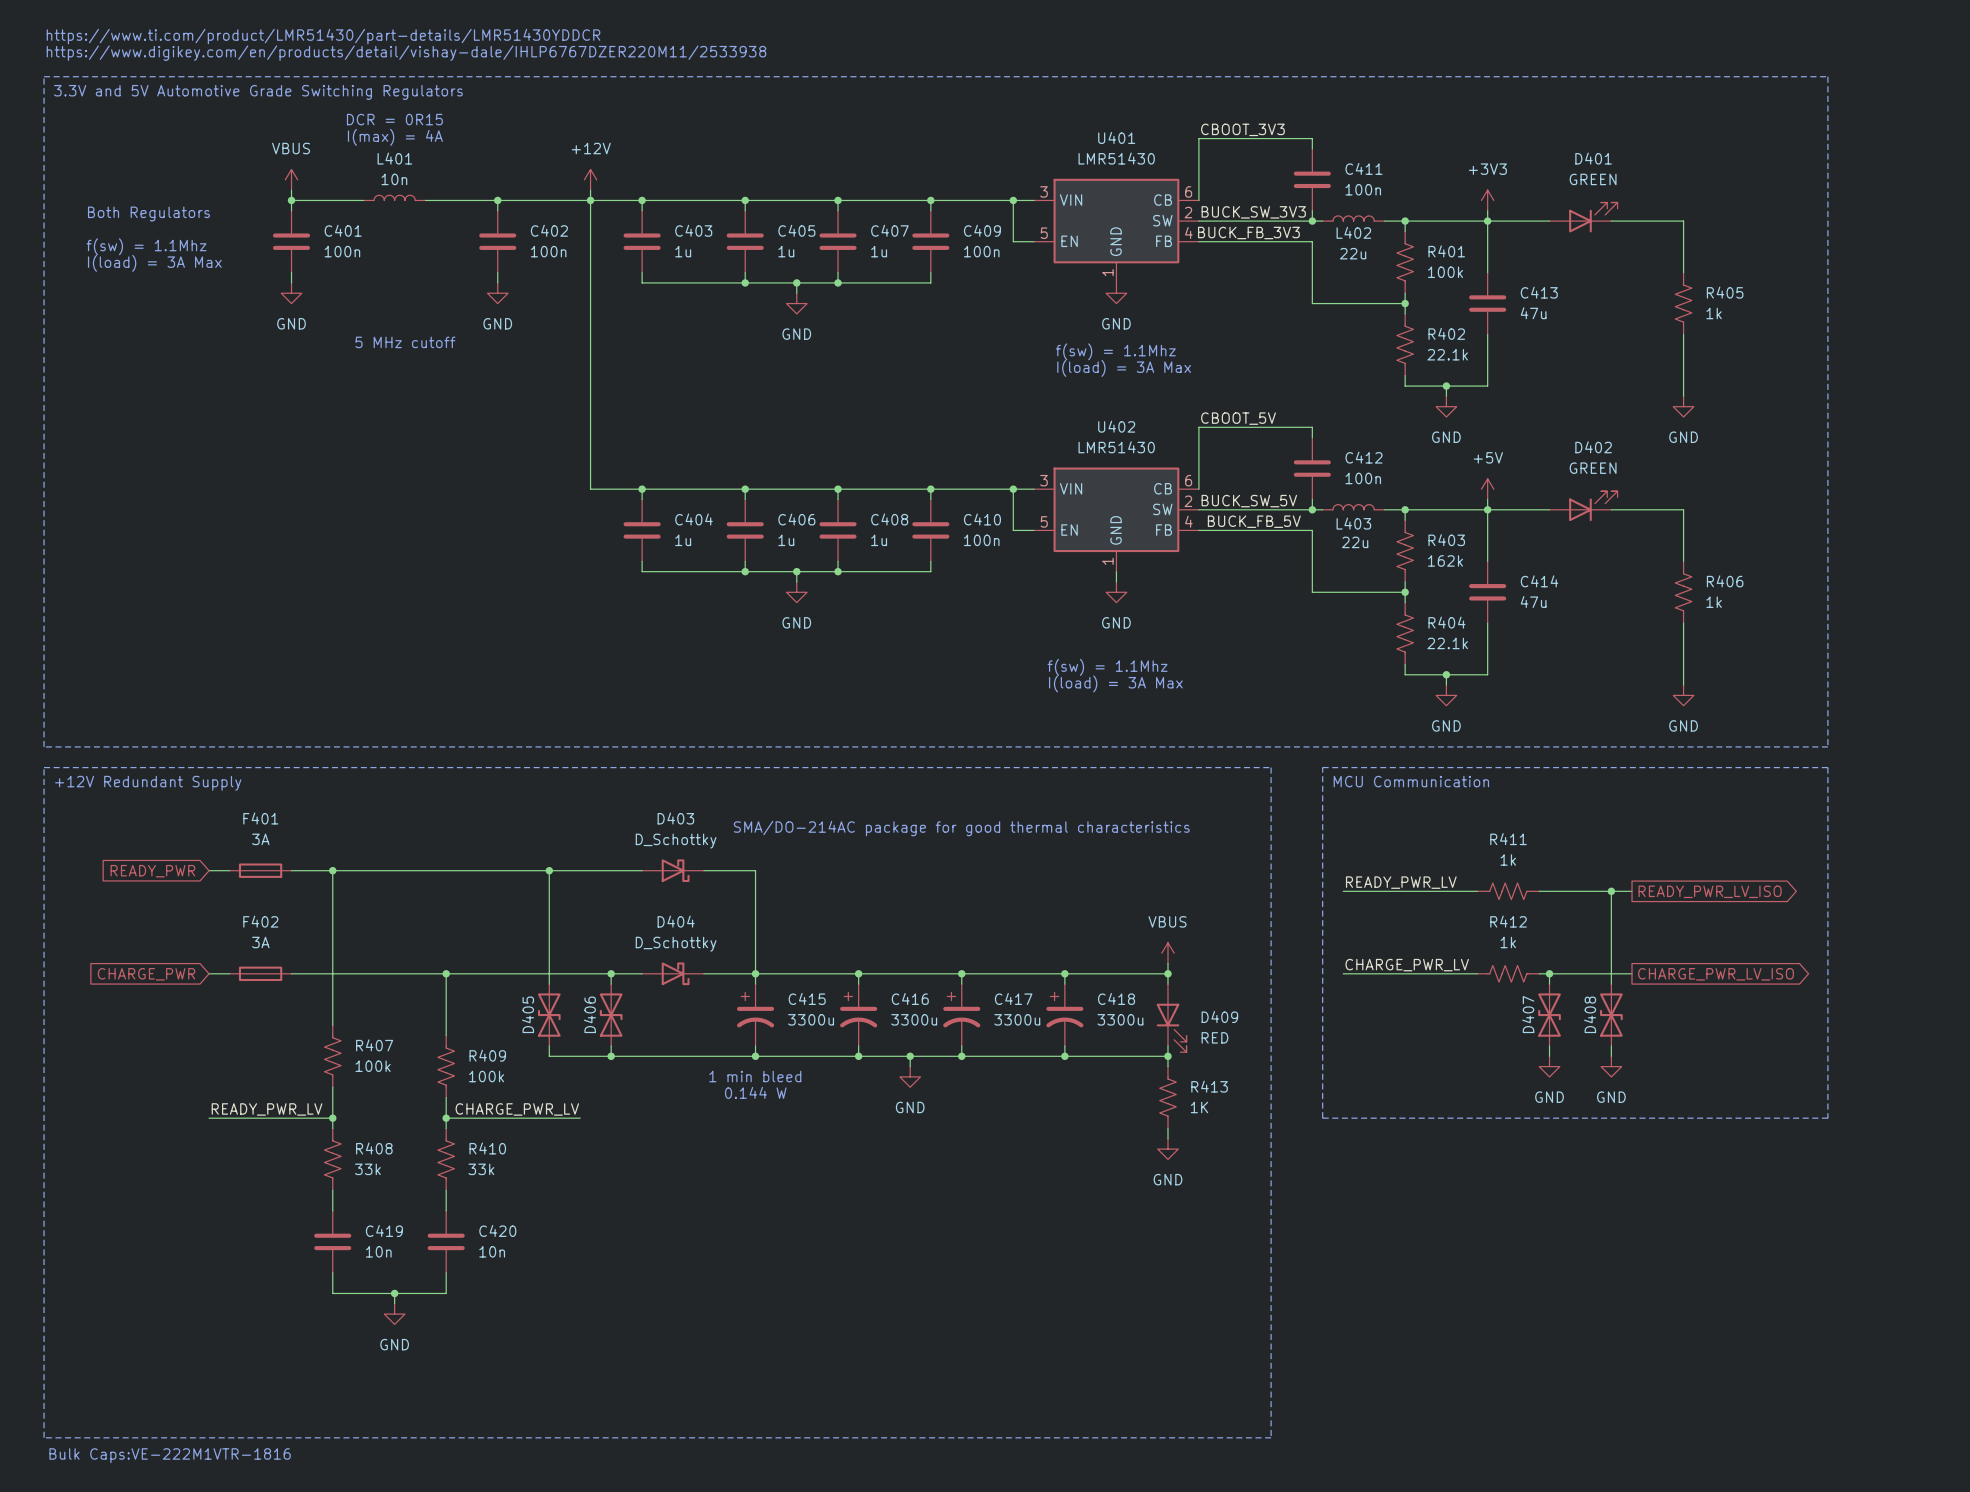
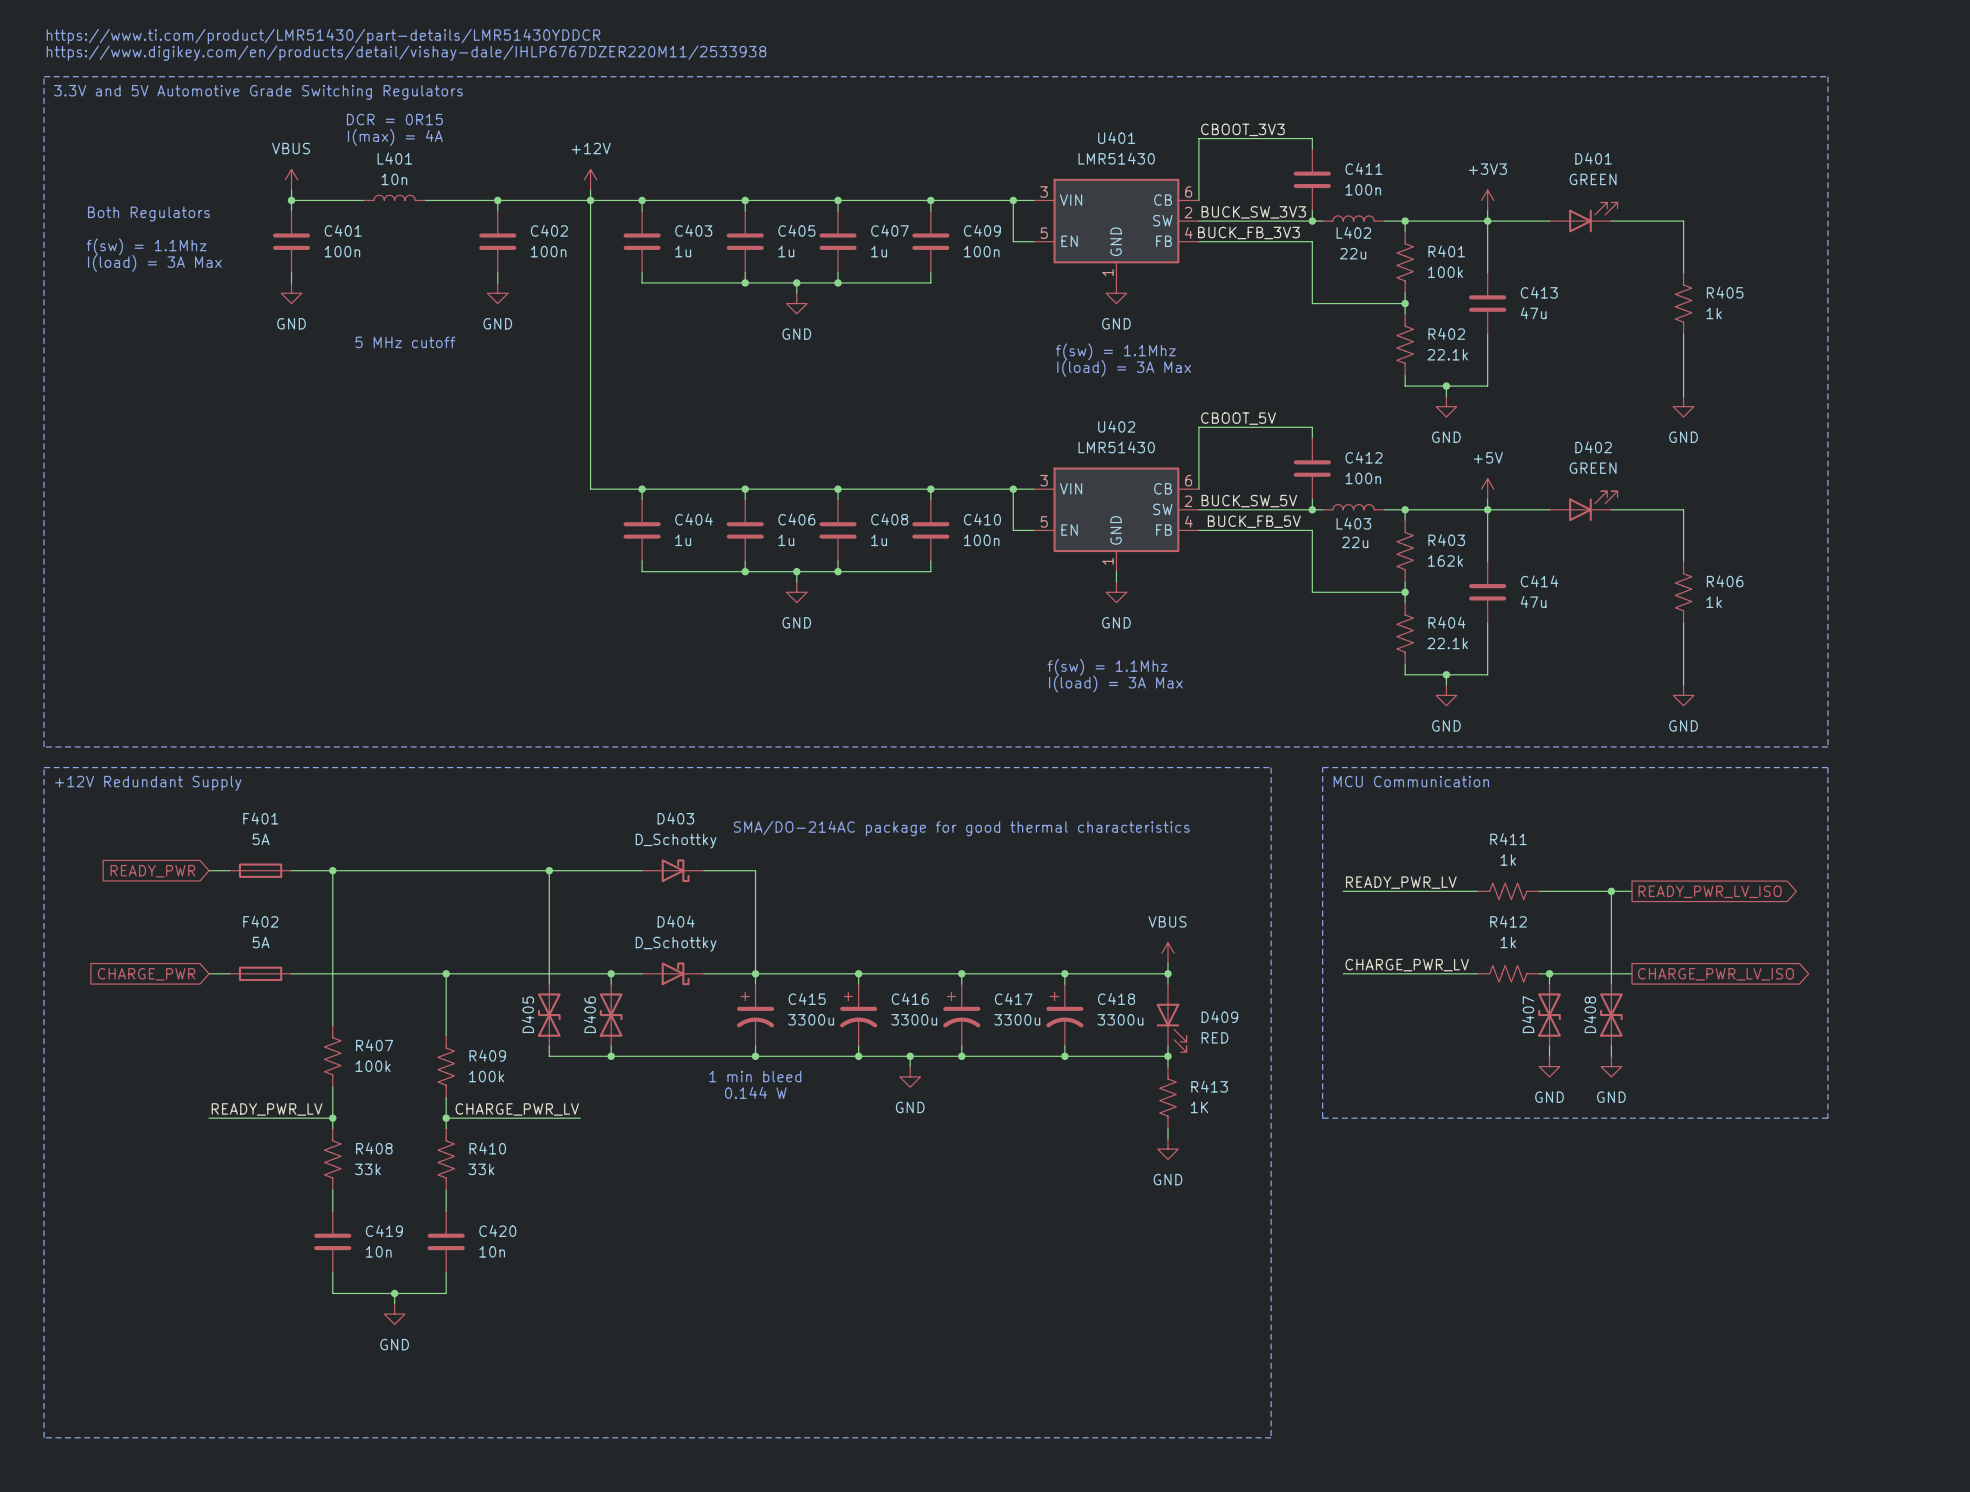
F401 value: 3A (260, 839) -> 5A (261, 839)
F402 value: 3A (260, 942) -> 5A (261, 942)
text: Bulk Caps:VE-222M1VTR-1816 (170, 1455) -> none

